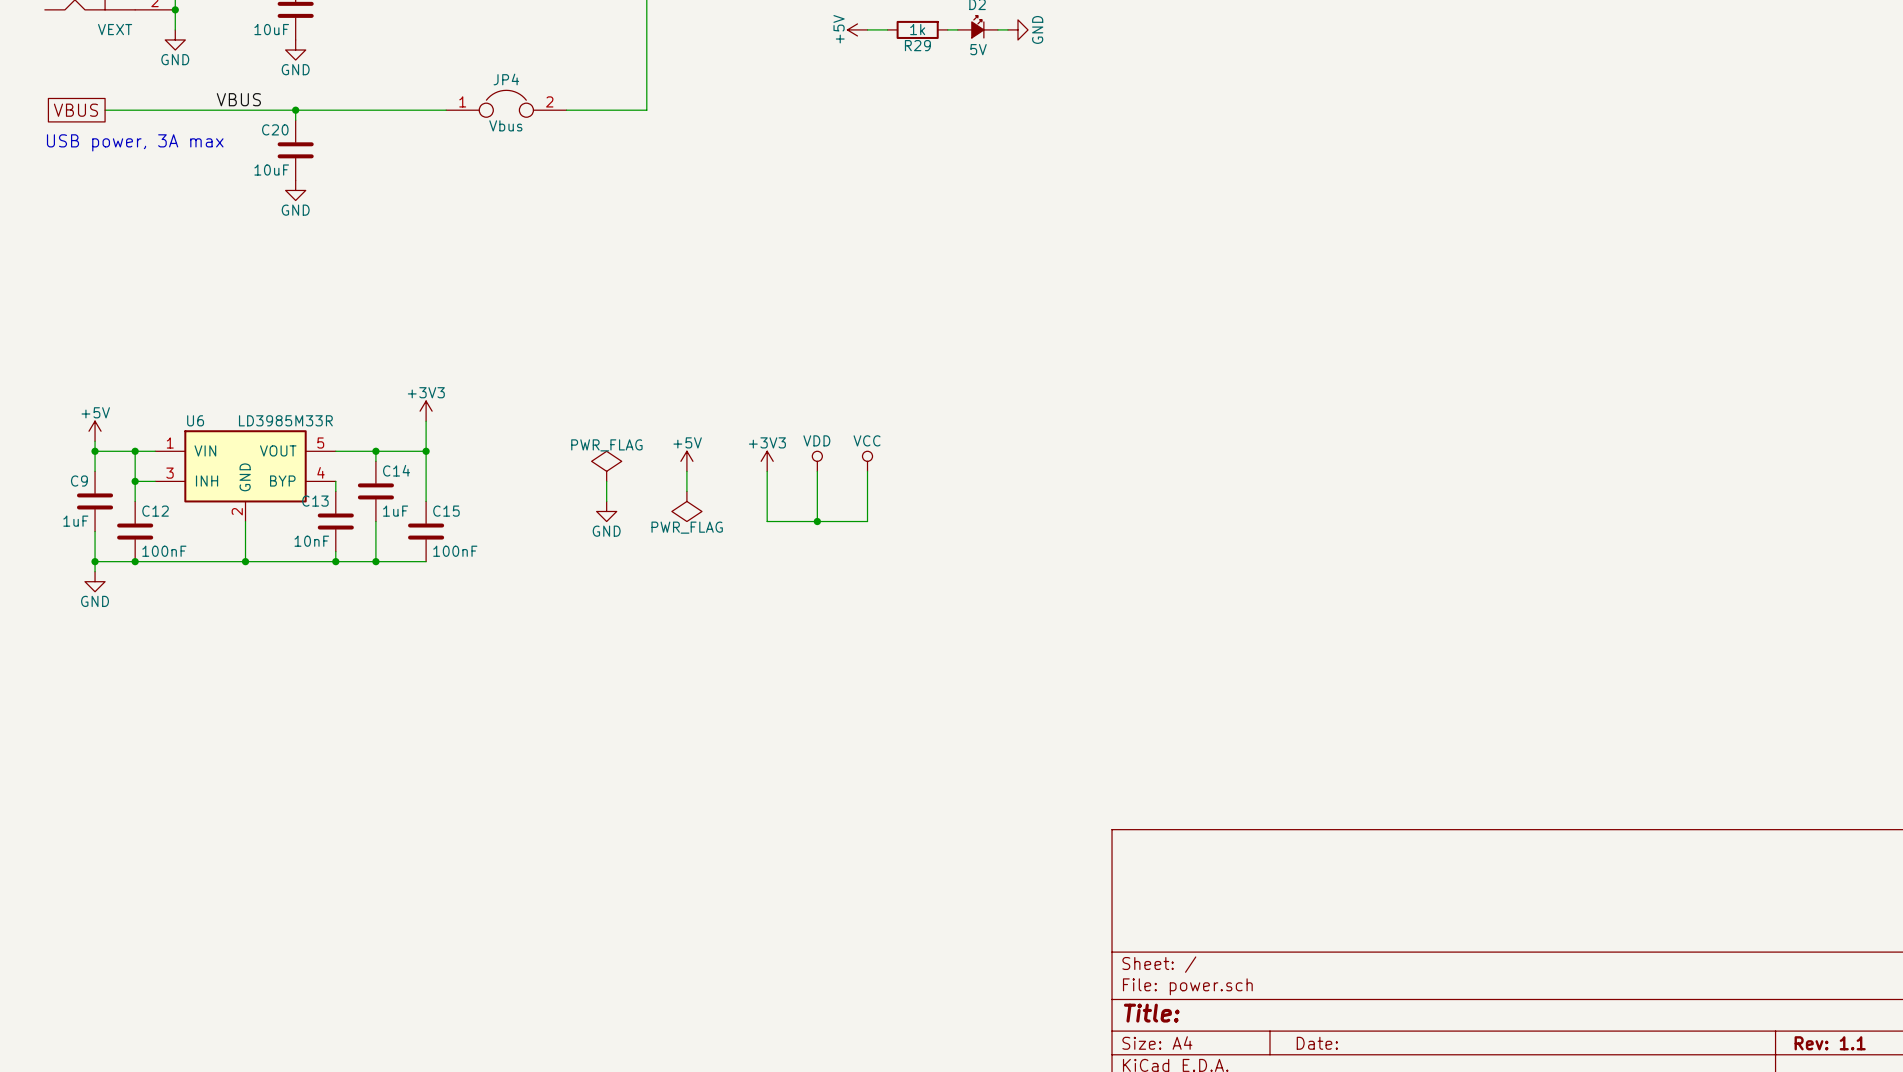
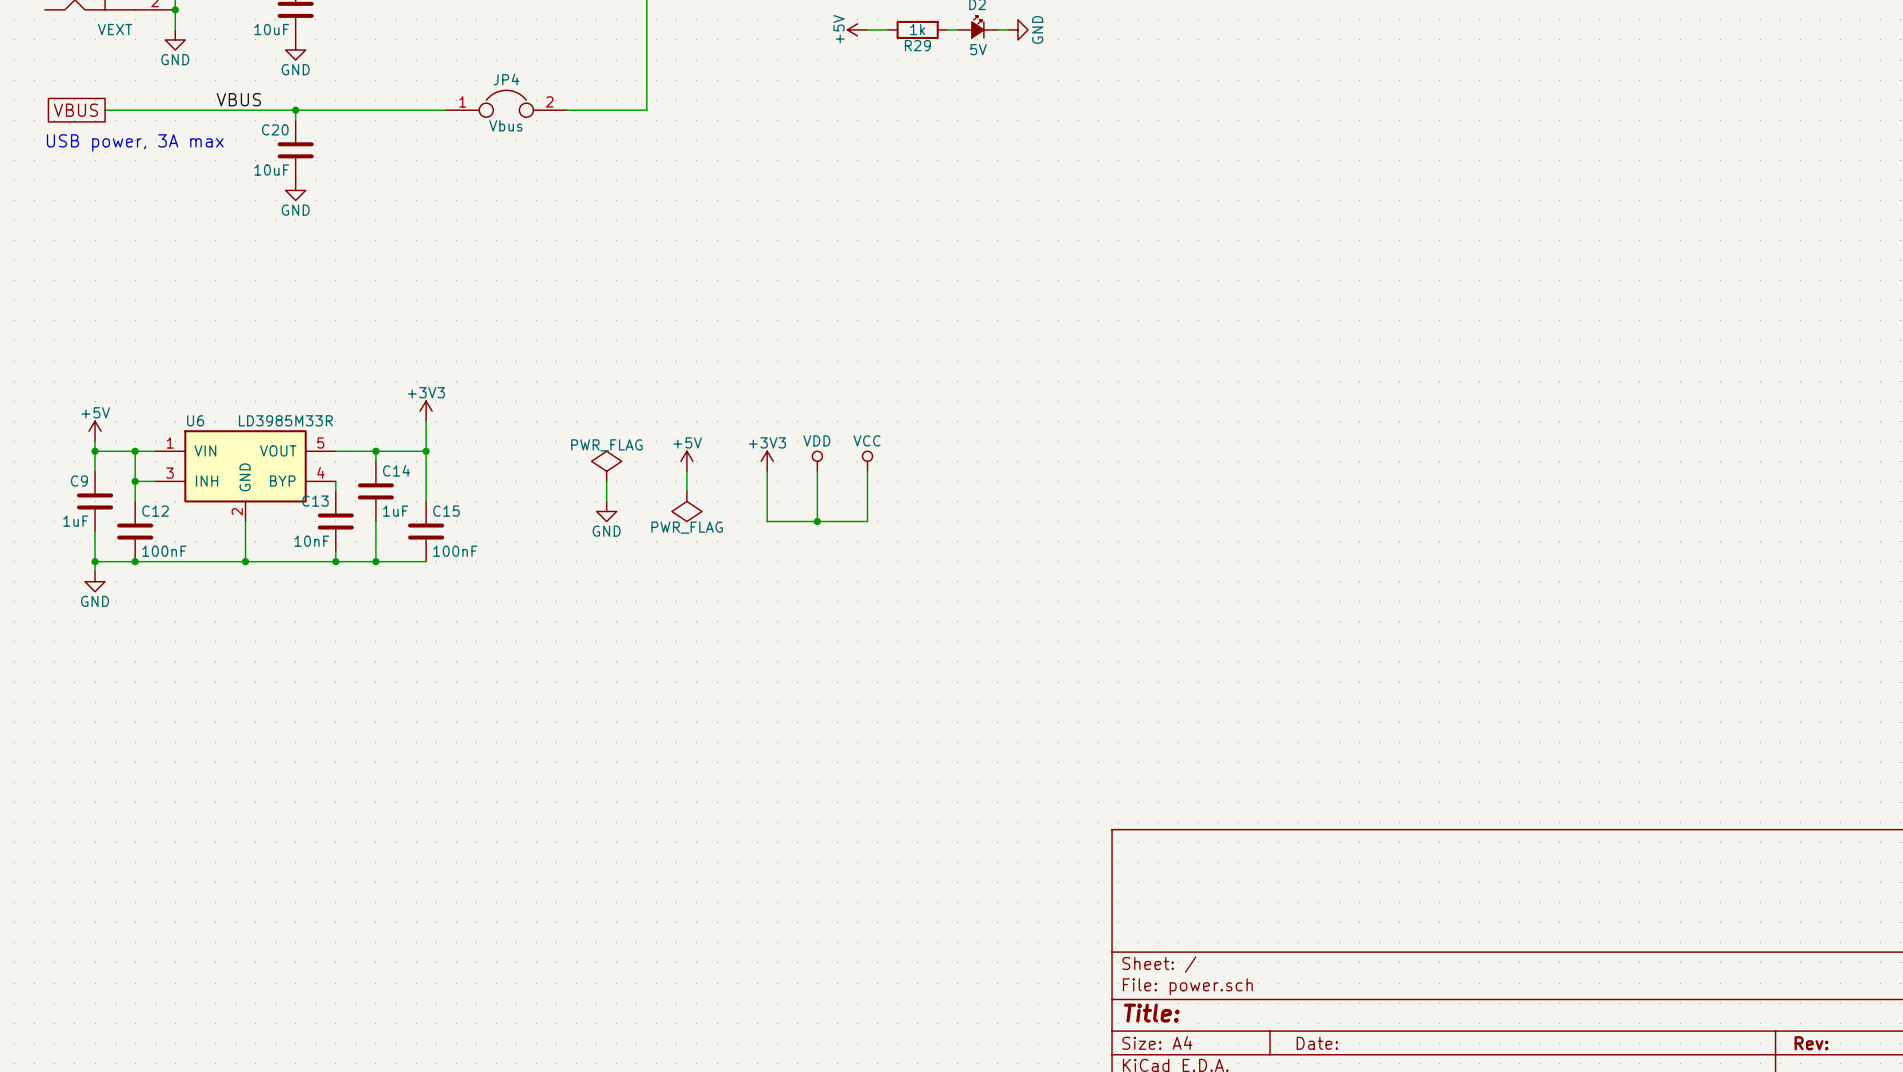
title block: Rev: 1.1 (1830, 1043) -> Rev: (1811, 1043)

